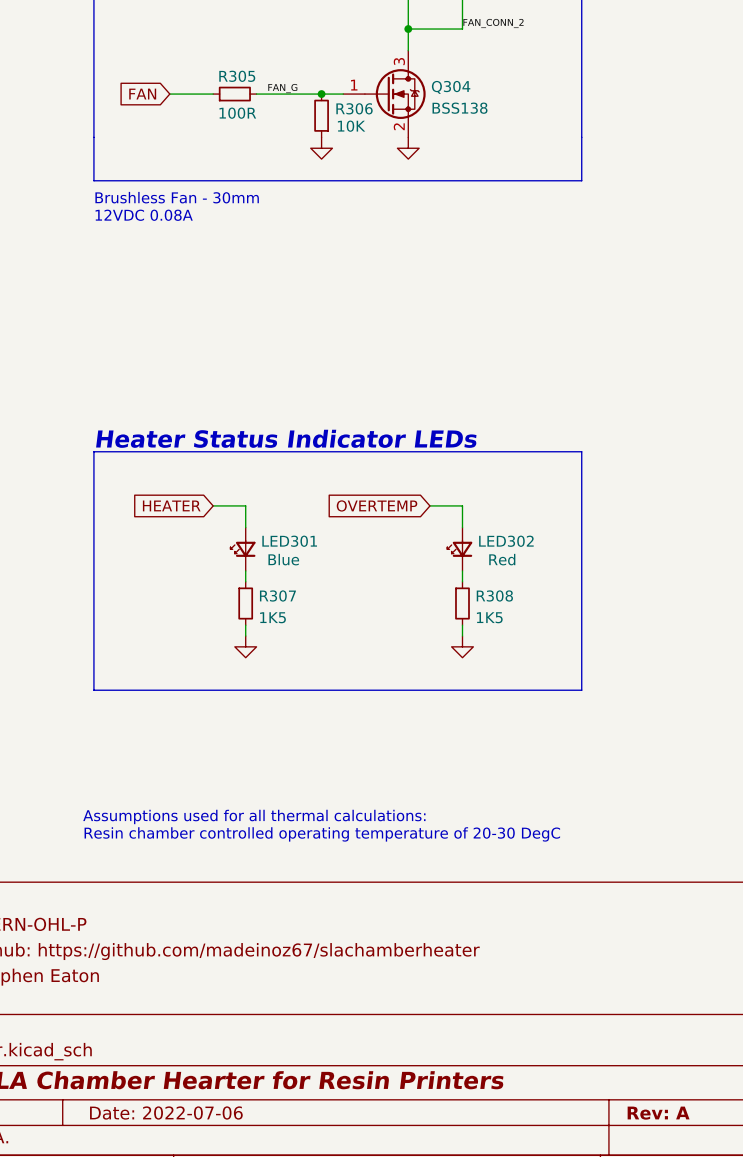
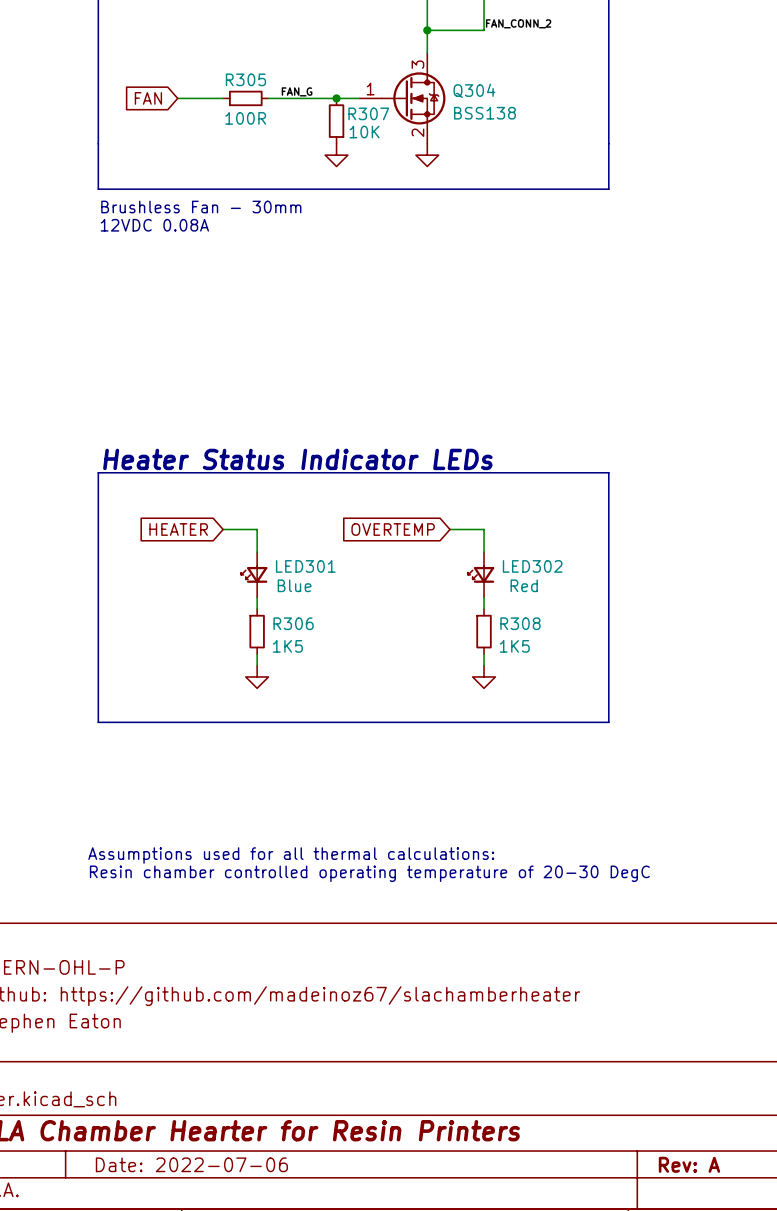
R306 name: R306 (354, 108) -> R307 (368, 113)
R307 name: R307 (277, 595) -> R306 (293, 623)

